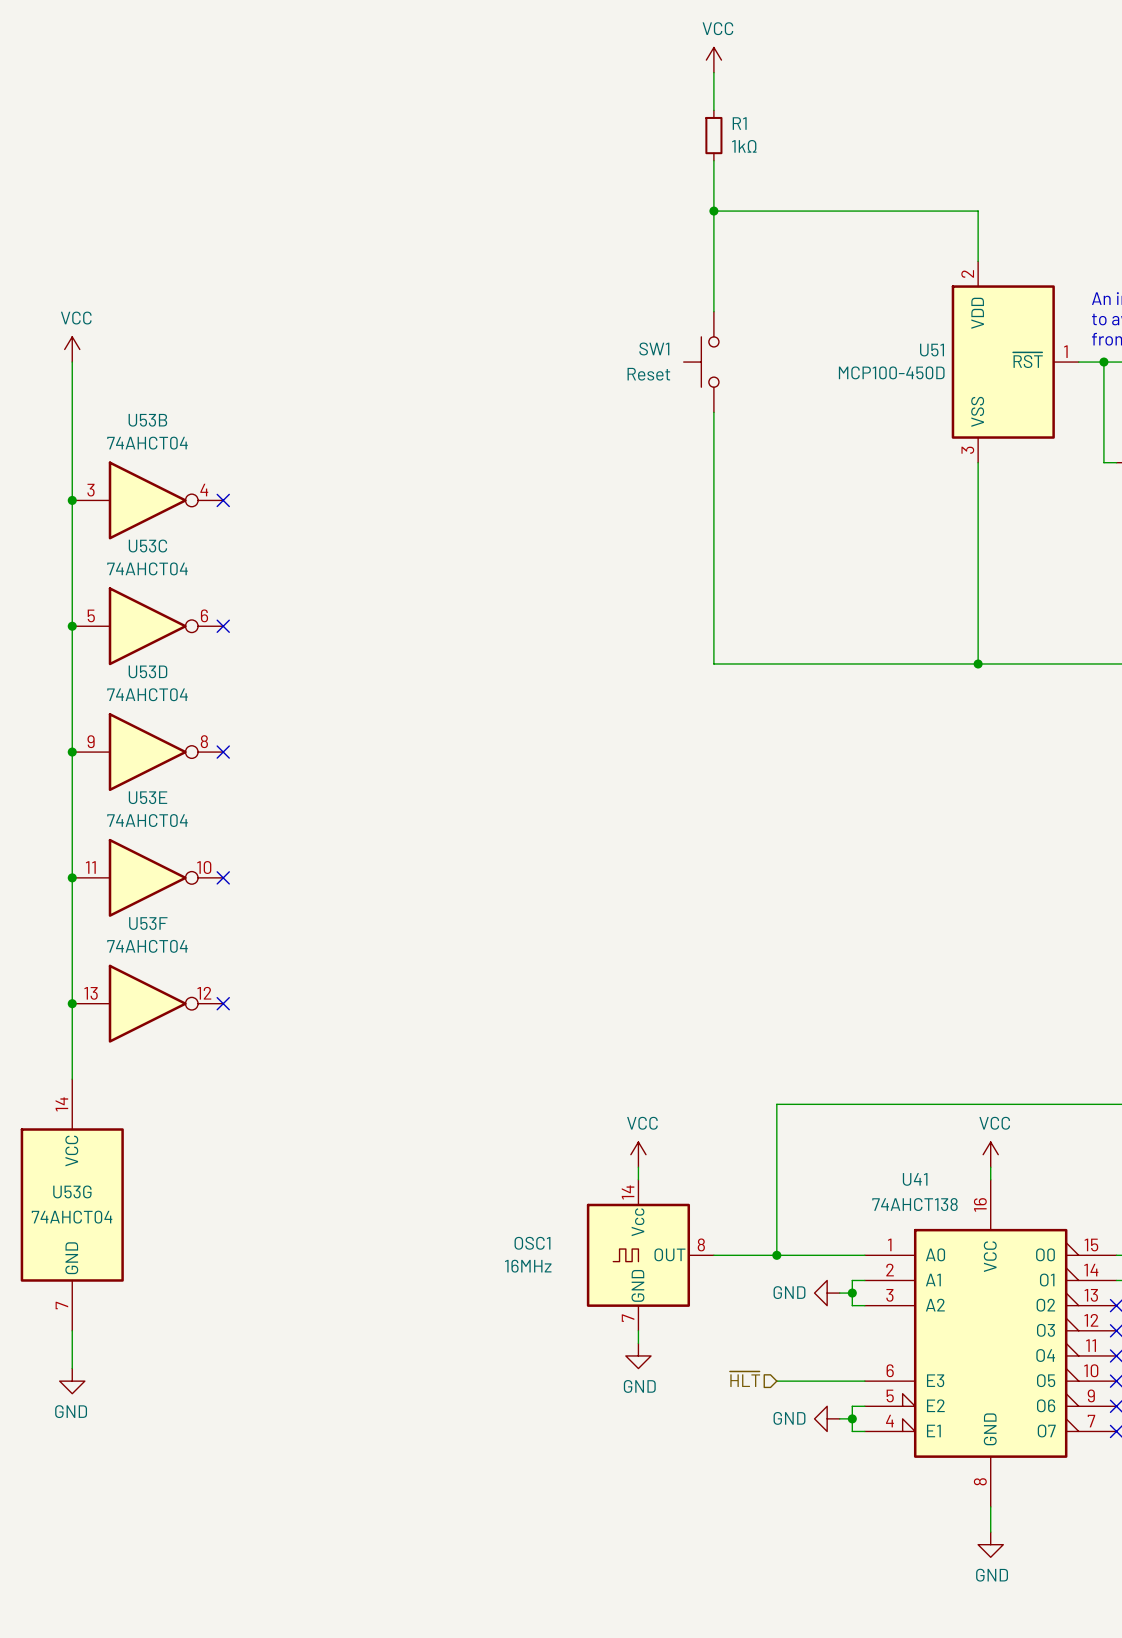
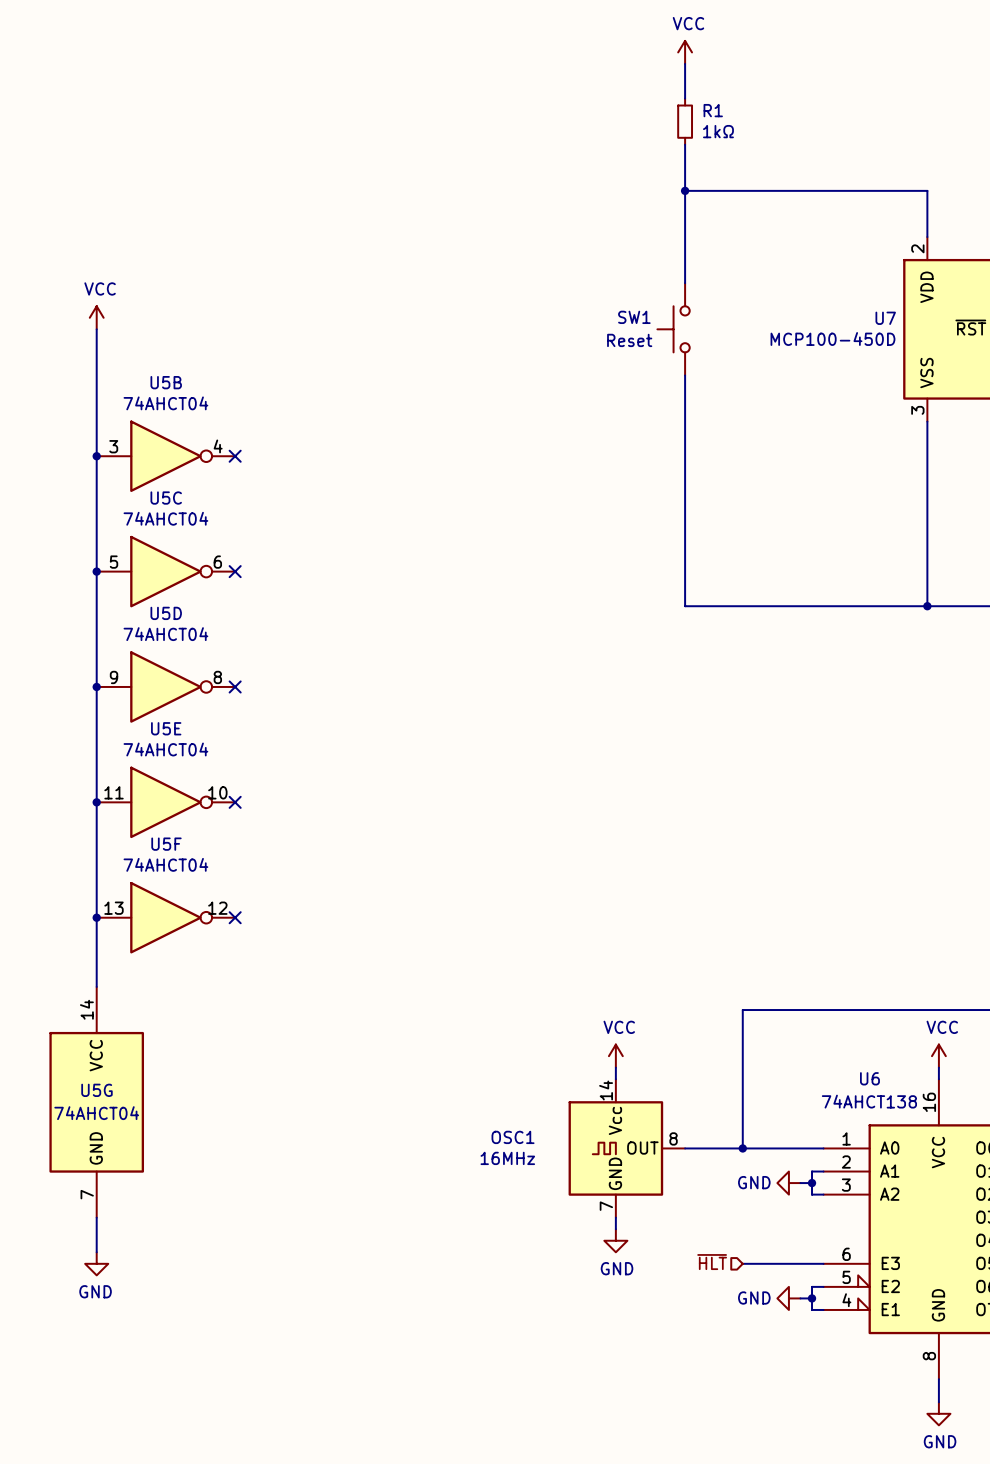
U51 name: U51 (932, 350) -> U7 (885, 318)
U53B name: U53B (147, 420) -> U5B (166, 382)
U53C name: U53C (147, 546) -> U5C (166, 498)
U53D name: U53D (147, 671) -> U5D (166, 613)
U53E name: U53E (148, 797) -> U5E (166, 728)
U53F name: U53F (148, 923) -> U5F (166, 844)
U41 name: U41 (915, 1179) -> U6 (869, 1078)
U53G name: U53G (72, 1191) -> U5G (96, 1090)

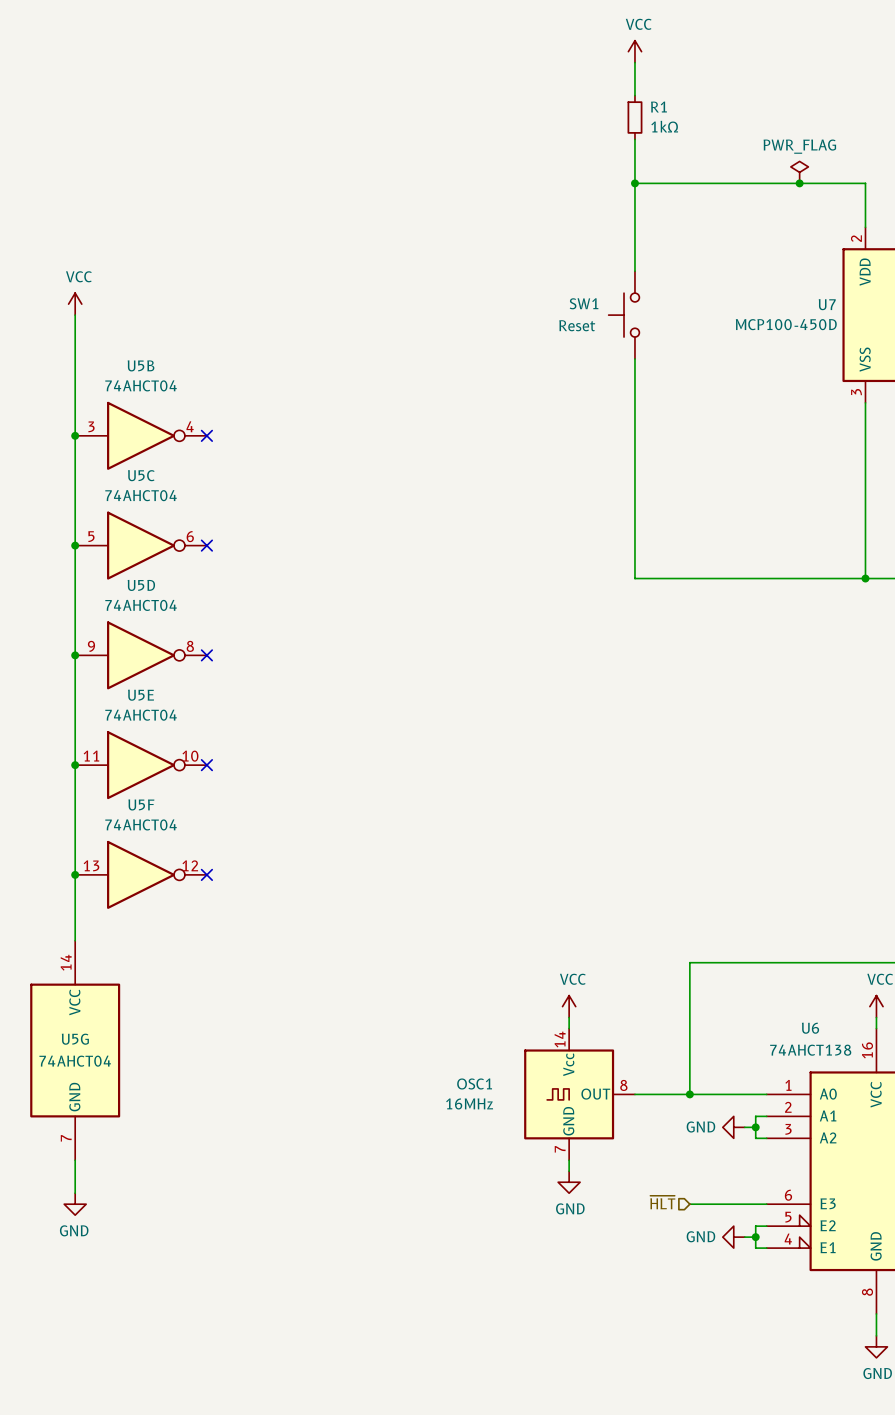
power symbol: none -> PWR_FLAG (799, 172)
junction: none -> (799, 183)

